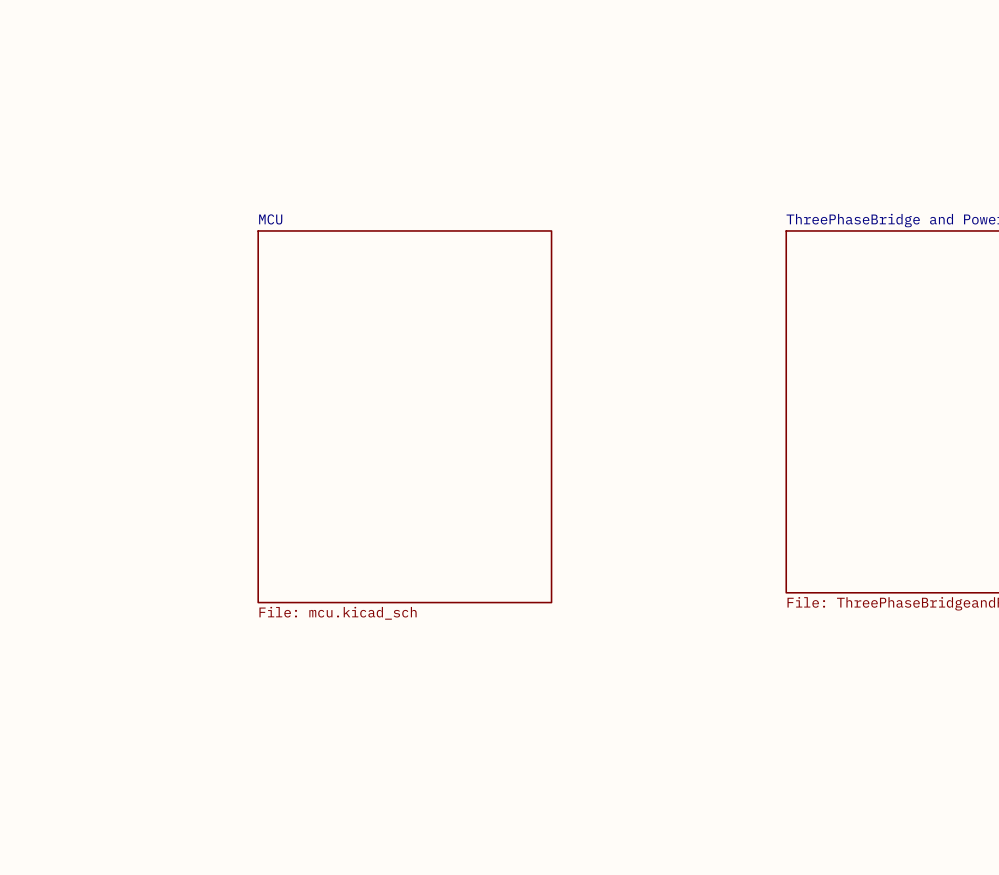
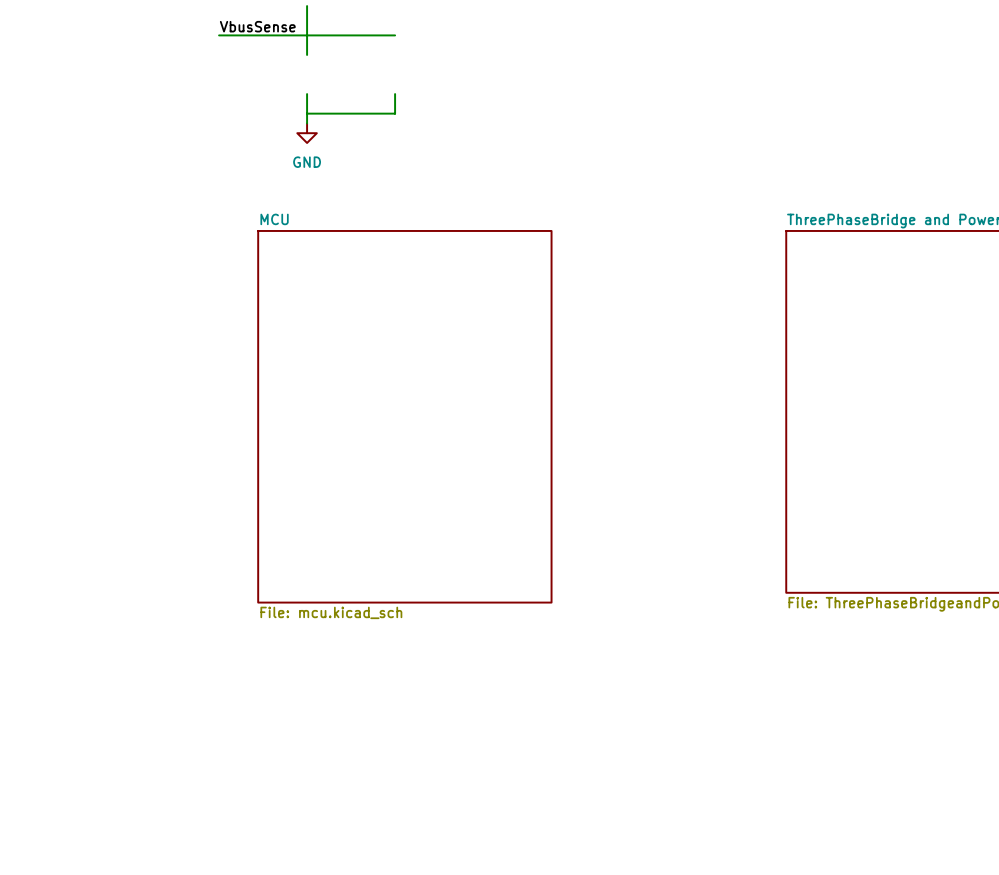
wire: none -> (307, 6) (307, 54)
label: none -> VbusSense (257, 26)
wire: none -> (219, 35) (395, 35)
wire: none -> (307, 94) (307, 123)
wire: none -> (395, 94) (395, 113) (307, 113)
power symbol: none -> GND (307, 133)

